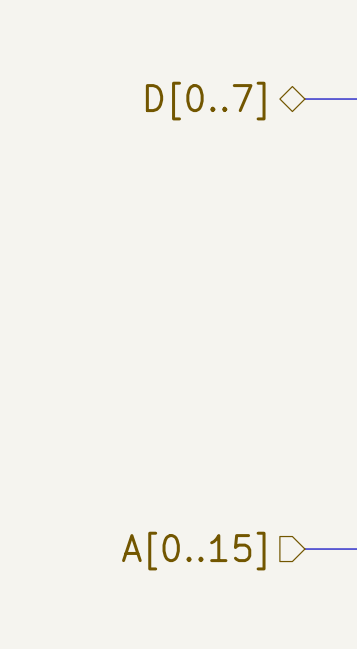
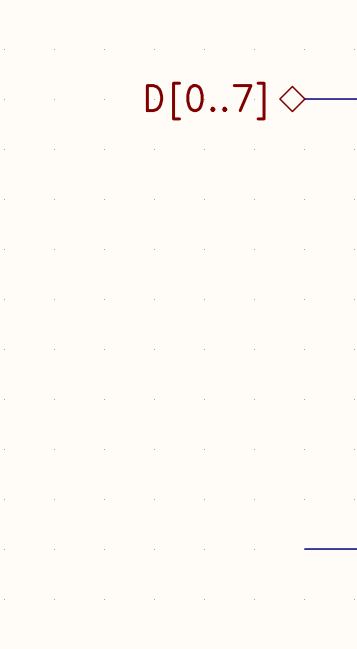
hierarchical label: A[0..15] (193, 551) -> none

